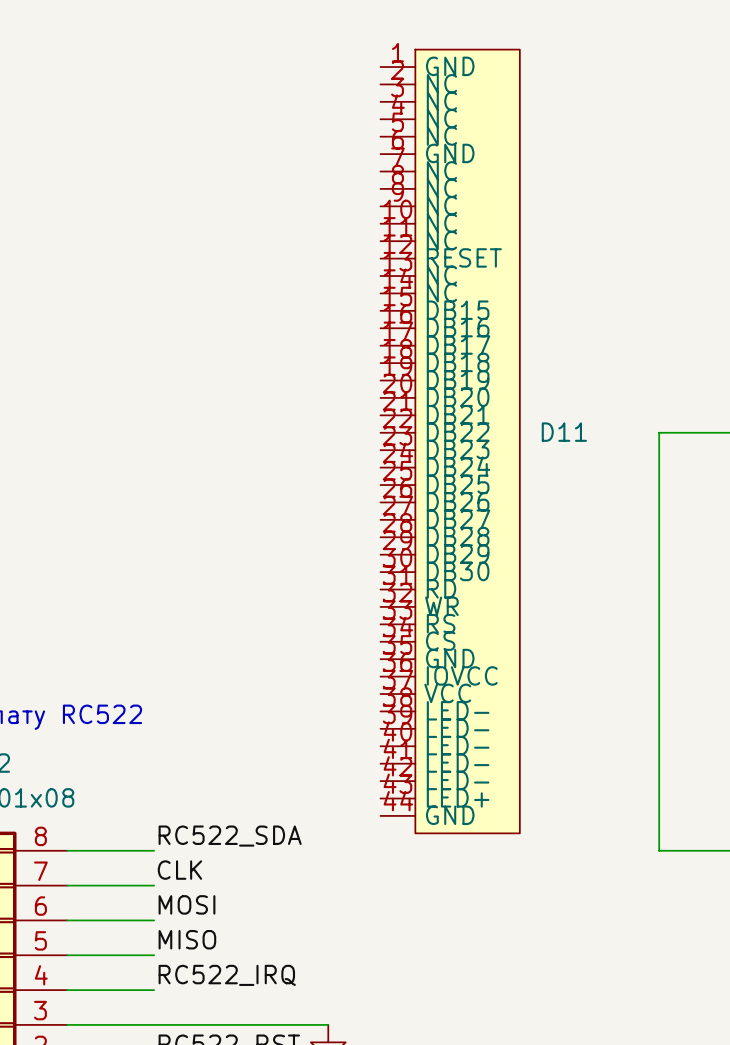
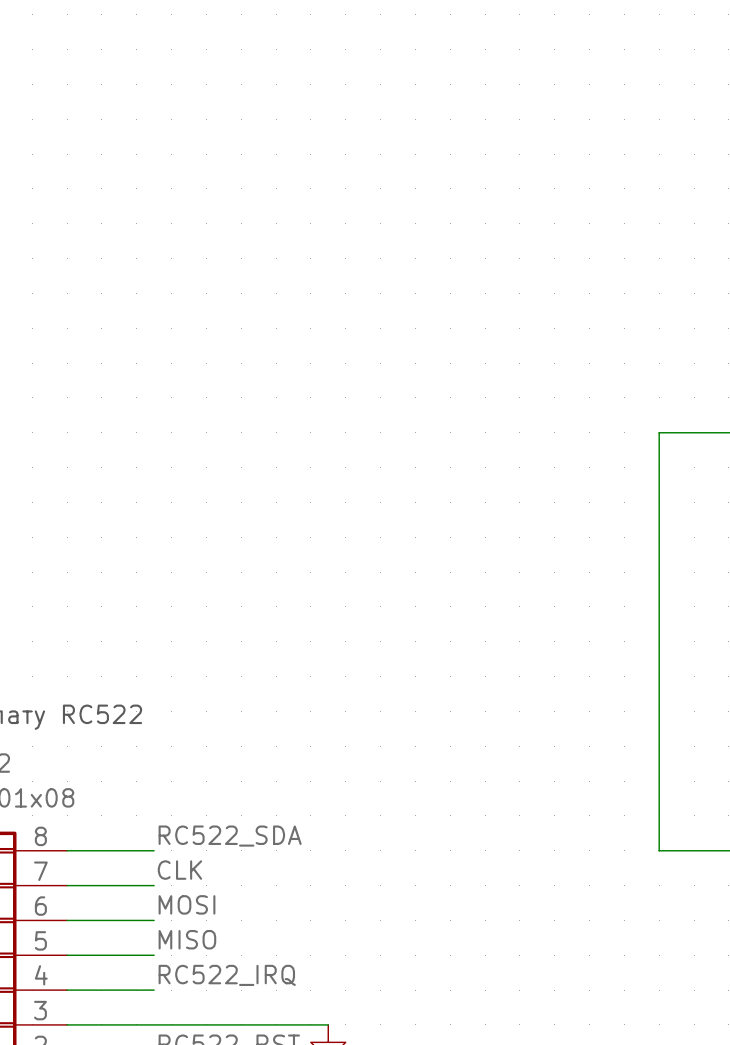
D11: (450, 441) -> none

